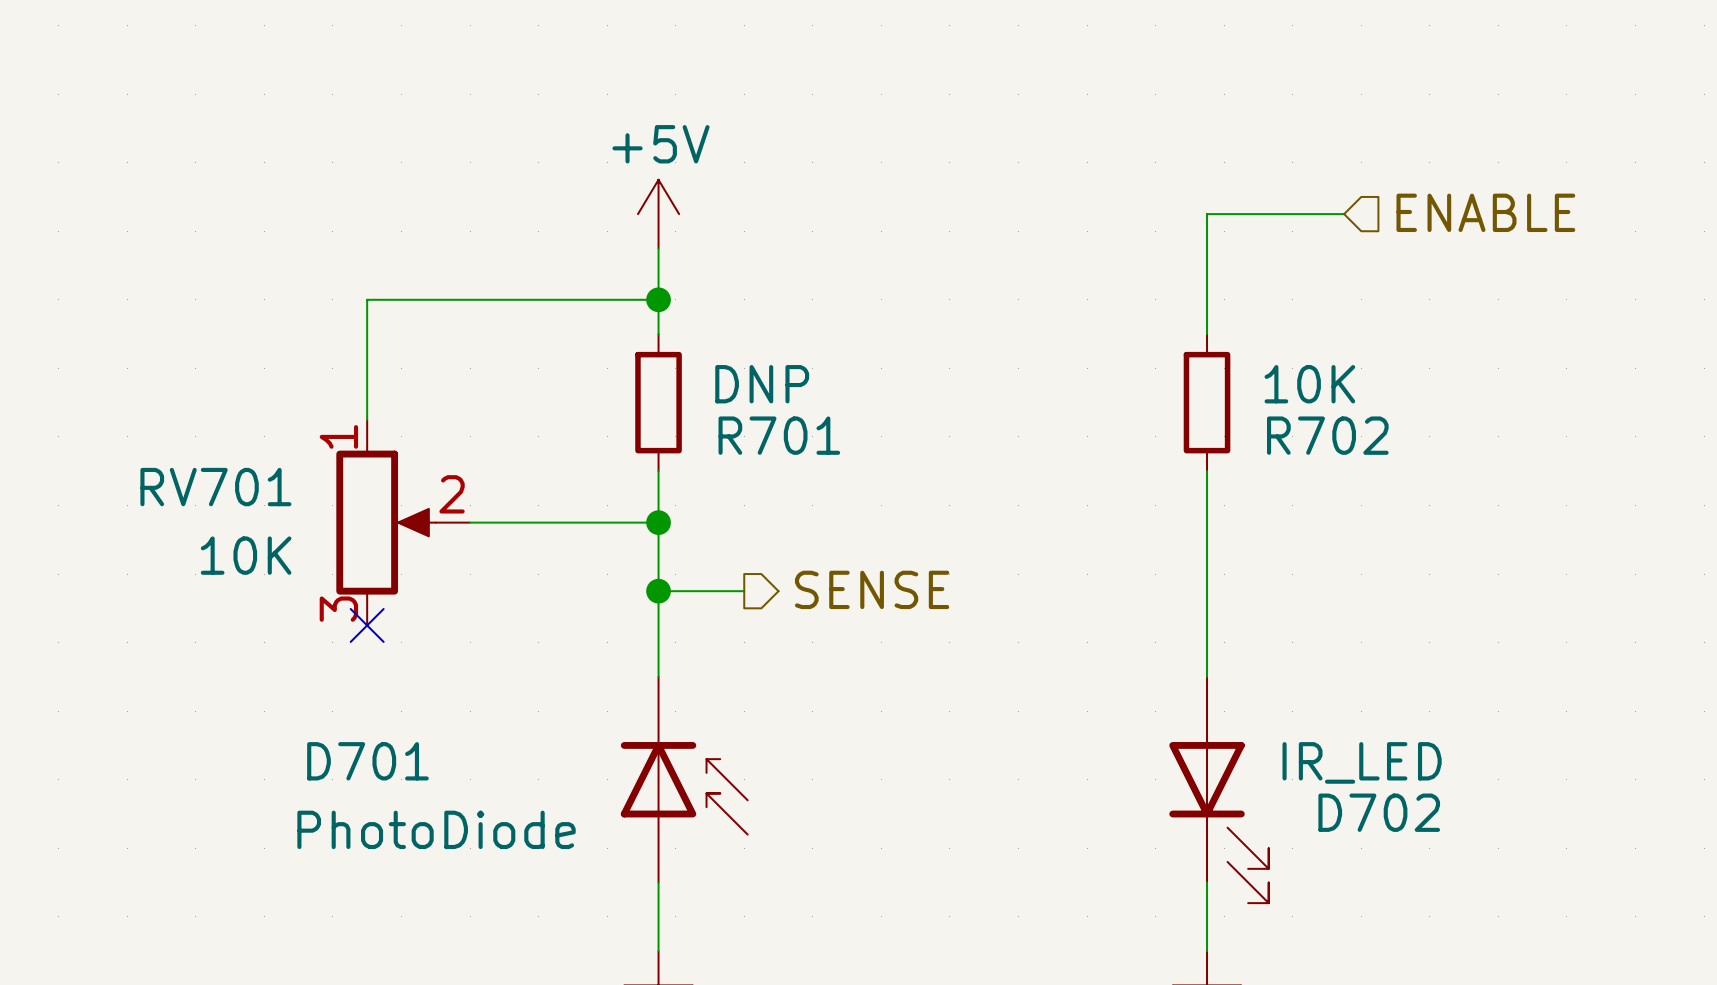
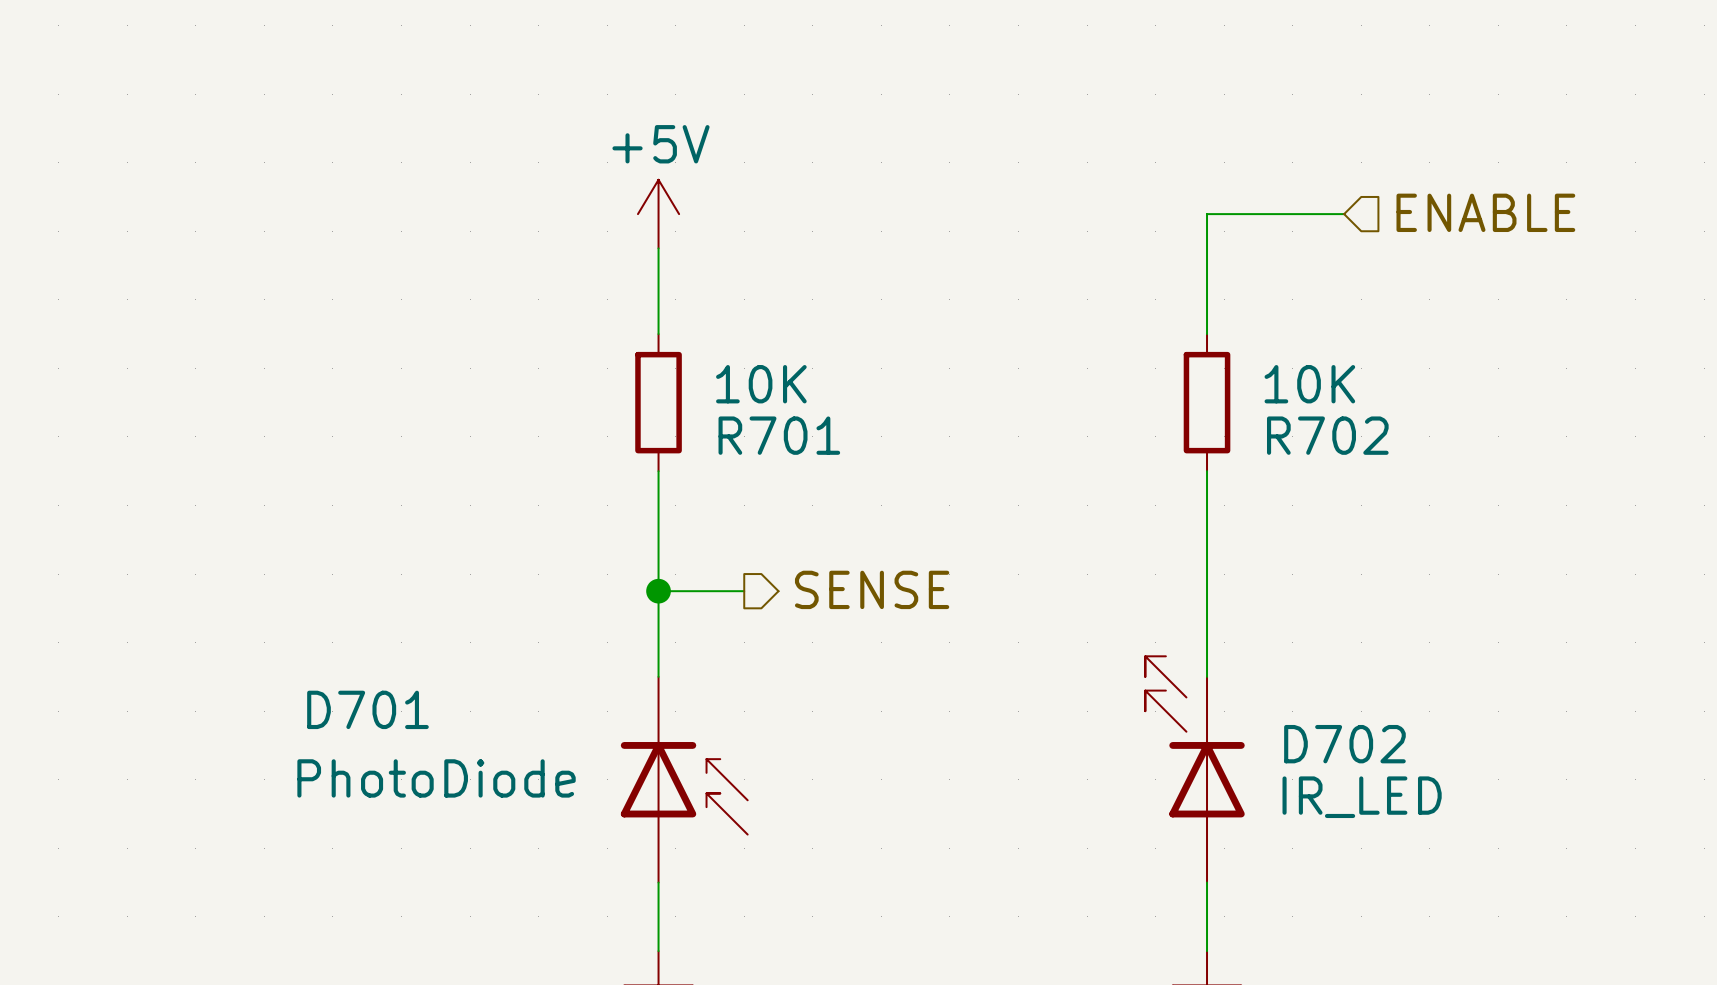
wire: (658, 299) (367, 299) (367, 419) -> none
junction: (658, 299) -> none
R701 value: DNP (762, 384) -> 10K (761, 384)
RV701: 10K (403, 522) -> none
wire: (470, 522) (658, 522) -> none
junction: (658, 522) -> none
no-connect mark: (367, 625) -> none
D701 name position: D701 (367, 761) -> D701 (367, 709)
D702 value position: IR_LED (1362, 762) -> IR_LED (1362, 797)
D702 rotation: 0° (1219, 822) -> 180° (1195, 736)
D701 value position: PhotoDiode (436, 829) -> PhotoDiode (436, 778)

